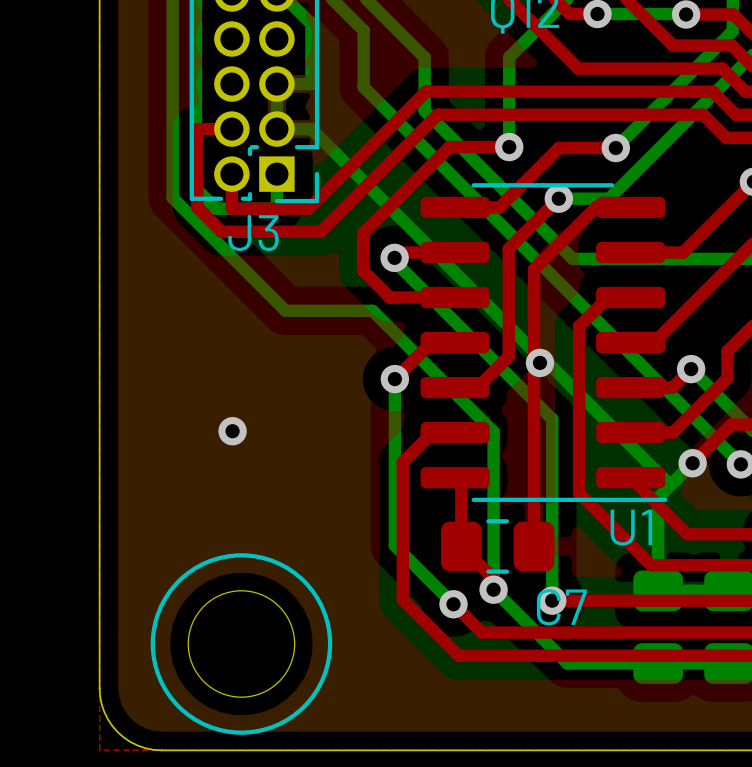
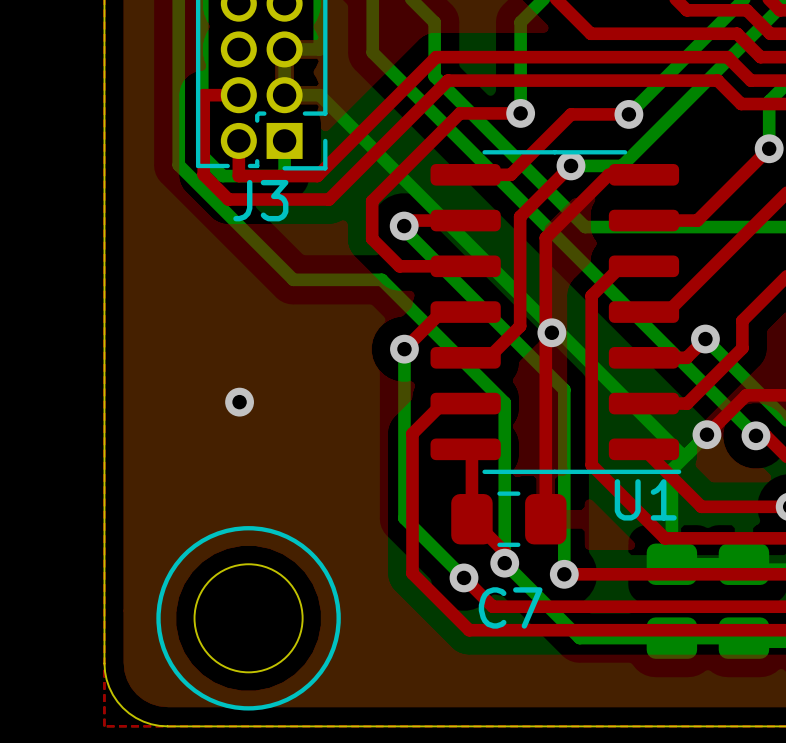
C7 name position: C7 (561, 607) -> C7 (510, 607)

